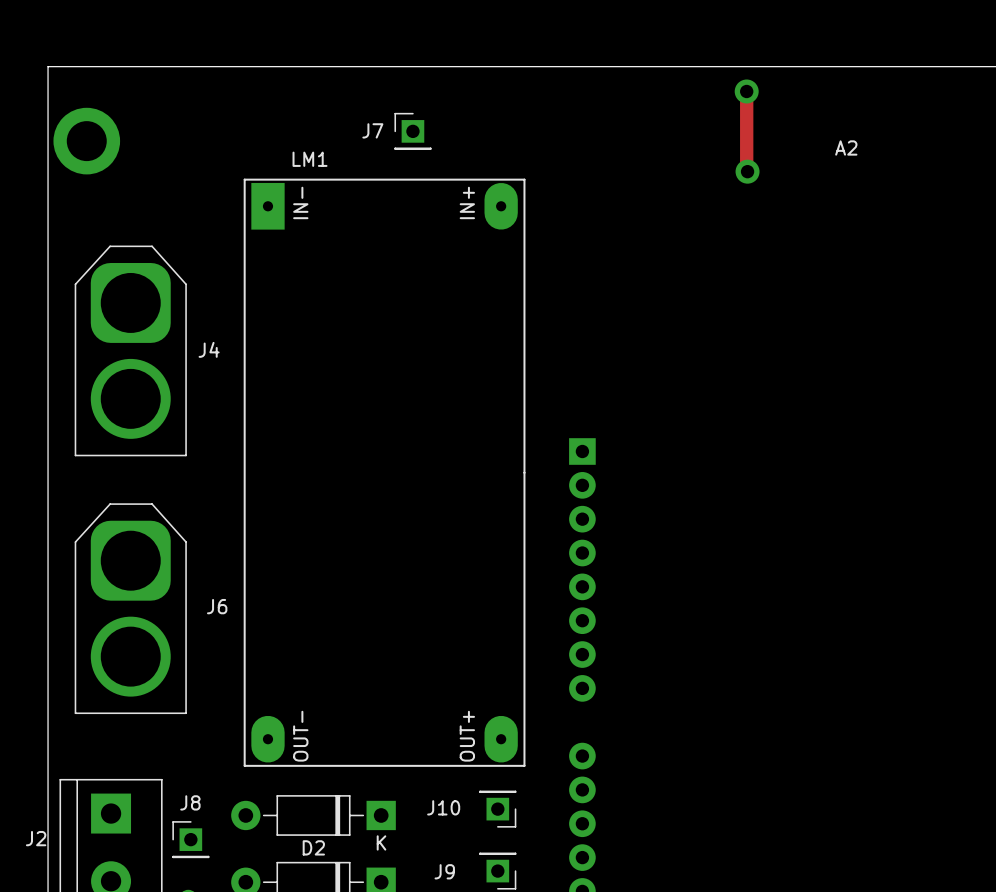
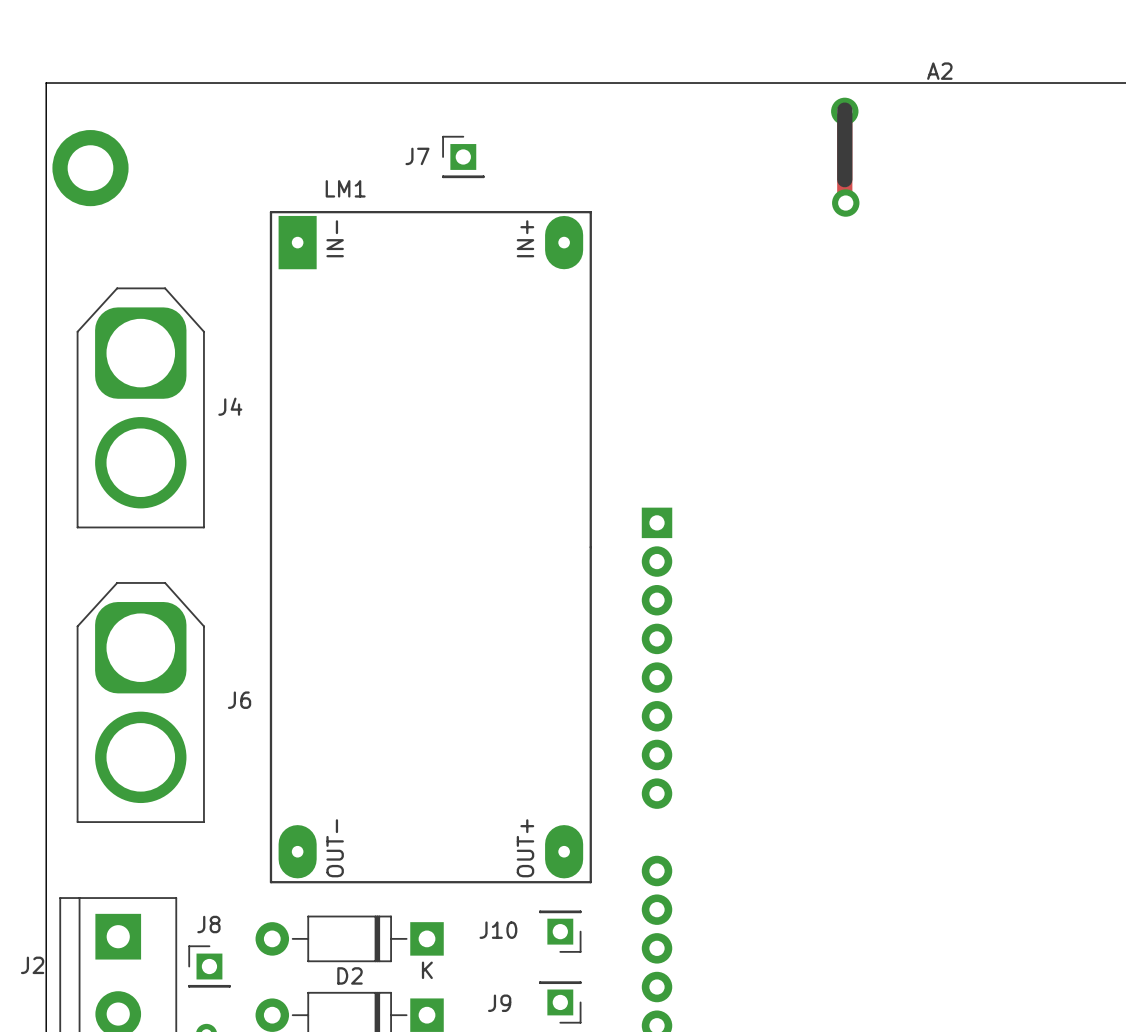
line: none -> (844, 110) (844, 179)
A2 name position: A2 (846, 147) -> A2 (939, 71)

